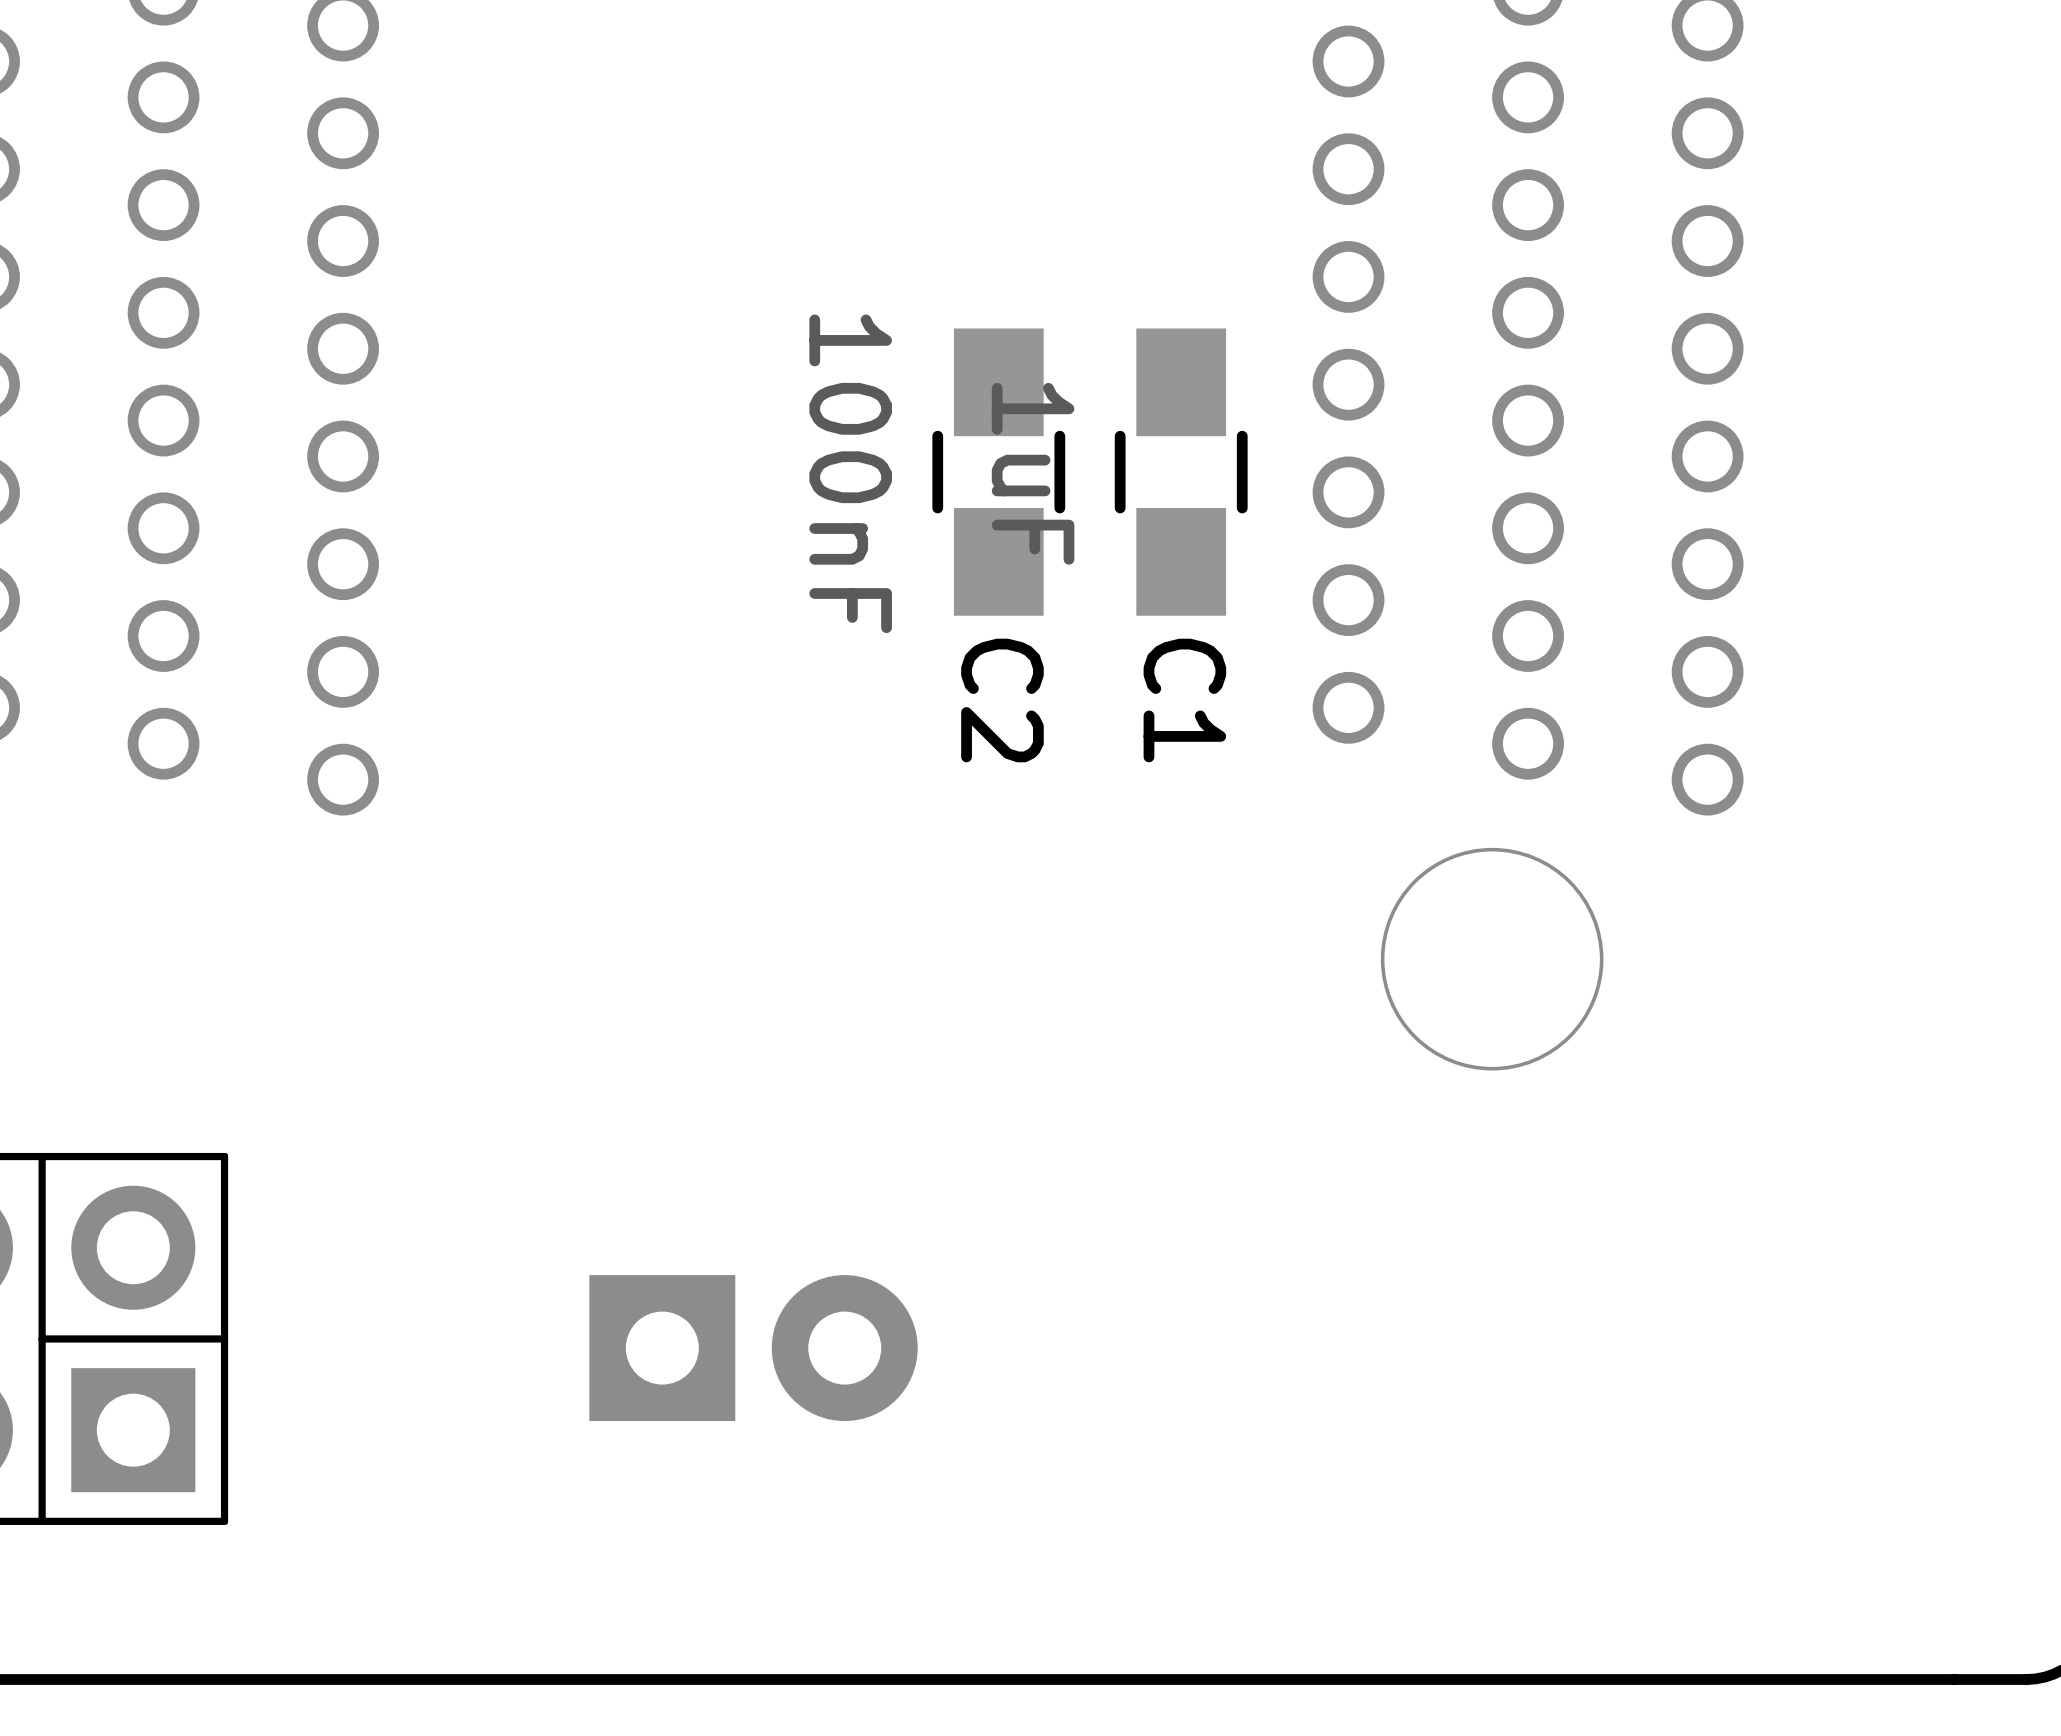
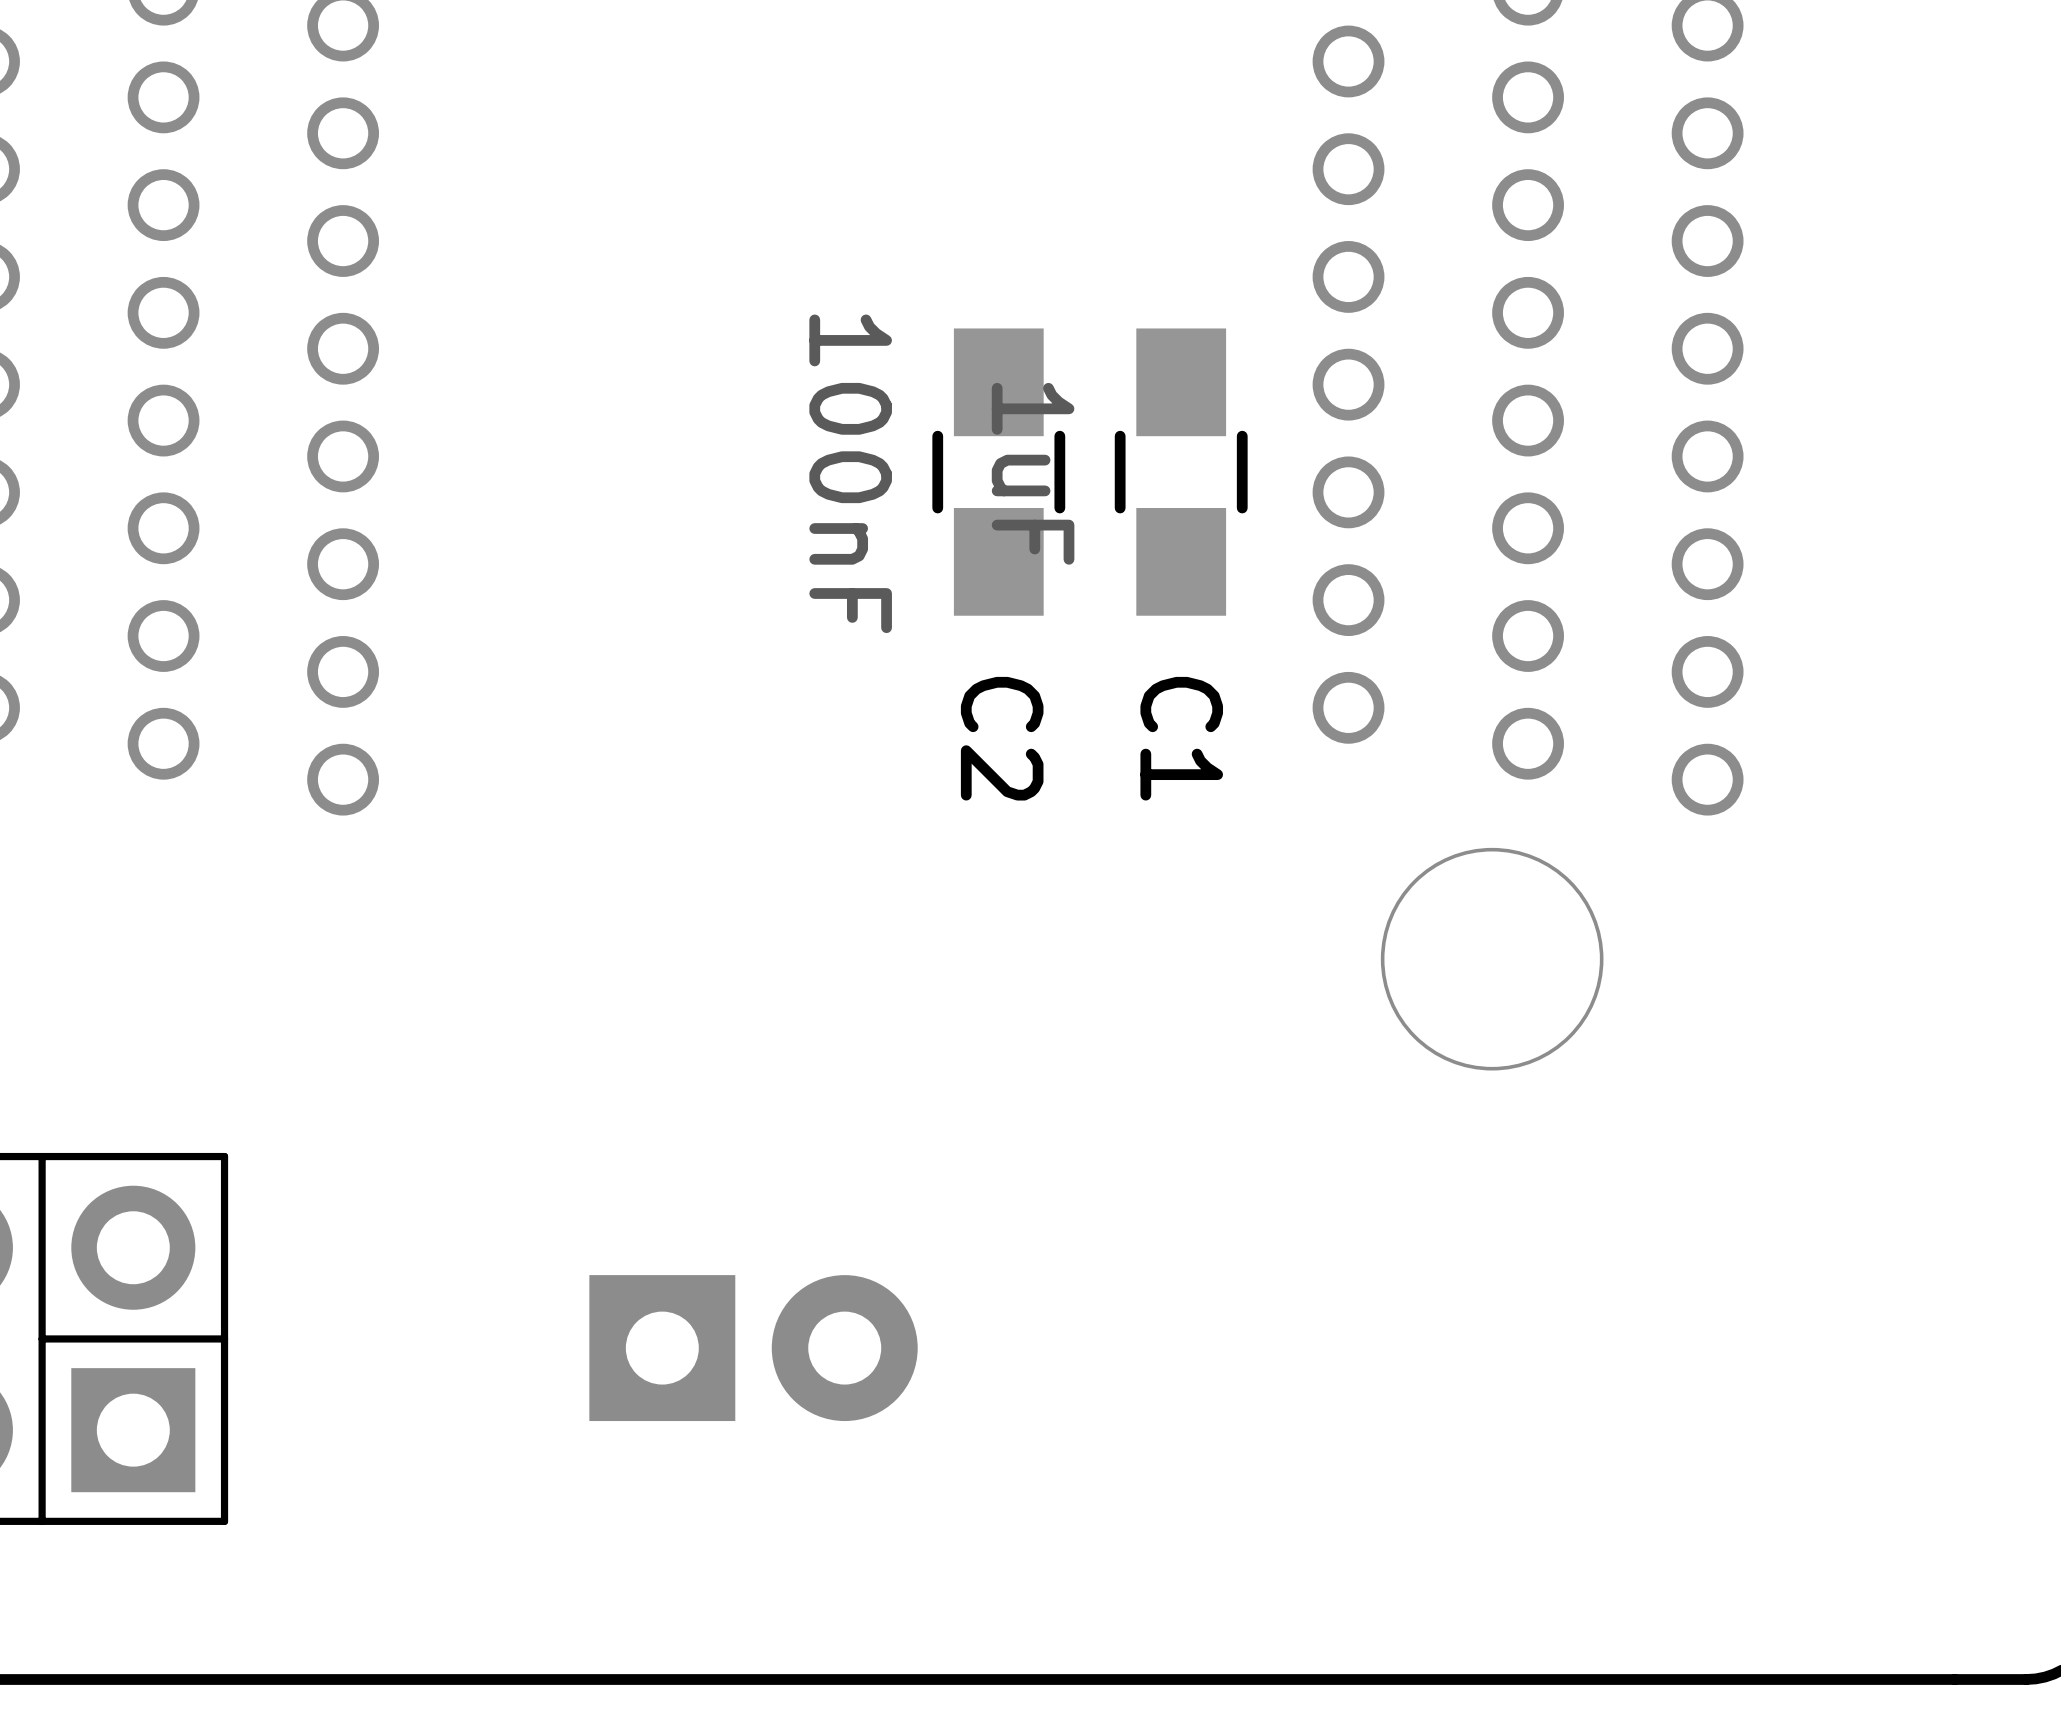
C2 name position: C2 (1002, 700) -> C2 (1002, 738)
C1 name position: C1 (1184, 700) -> C1 (1181, 738)

